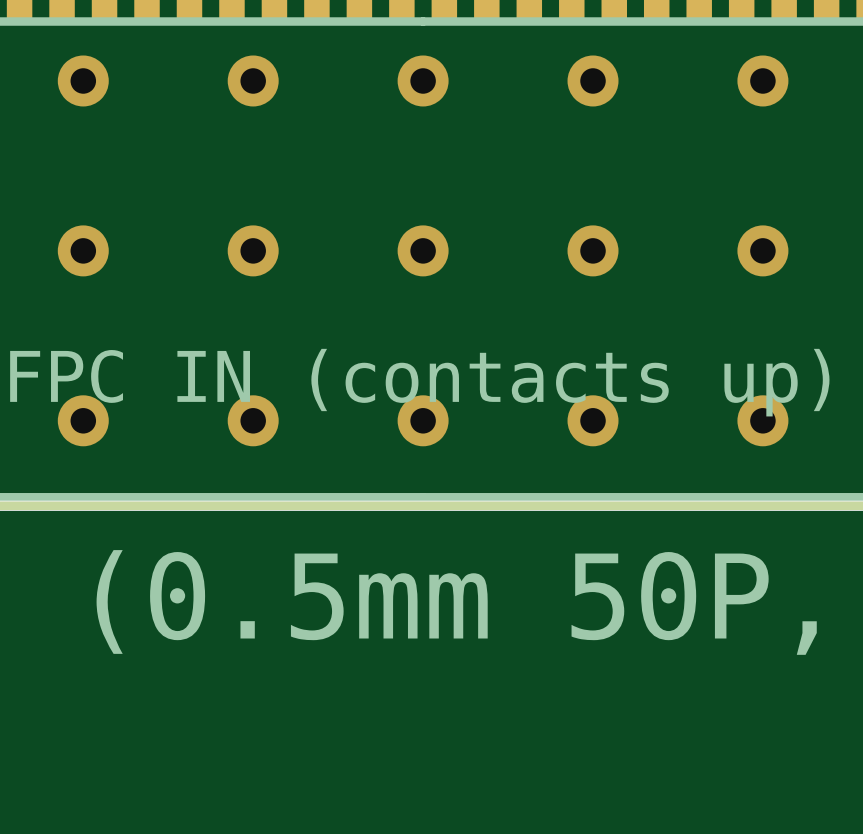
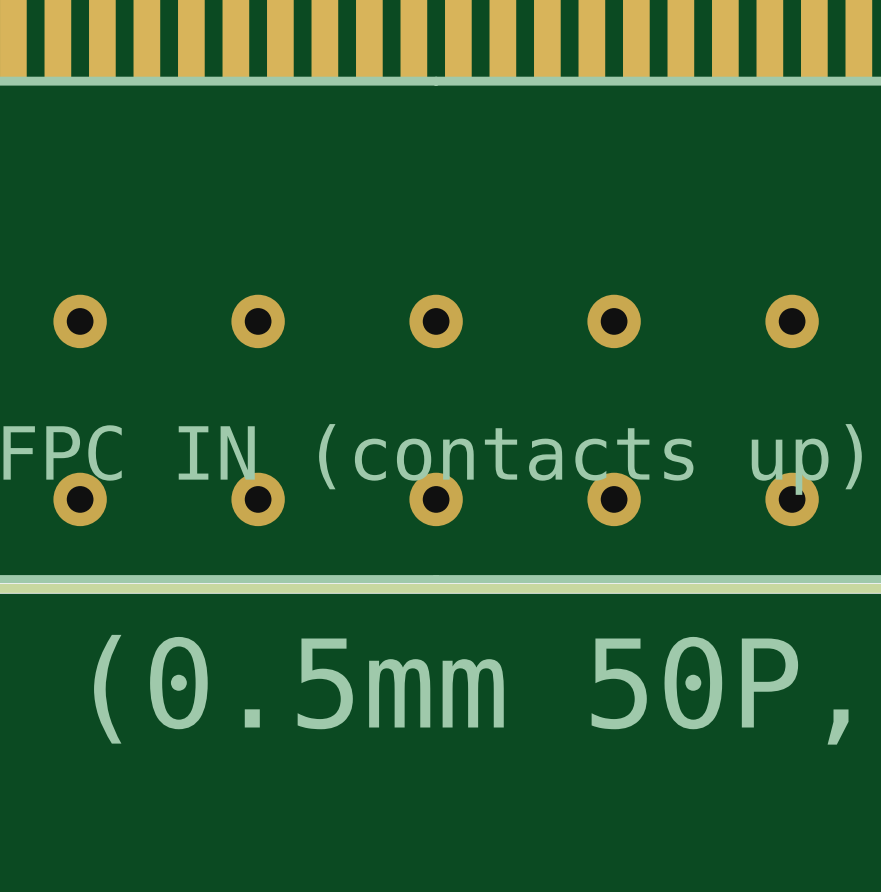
via: (83, 80) -> none
via: (253, 80) -> none
via: (423, 80) -> none
via: (593, 80) -> none
via: (762, 80) -> none

